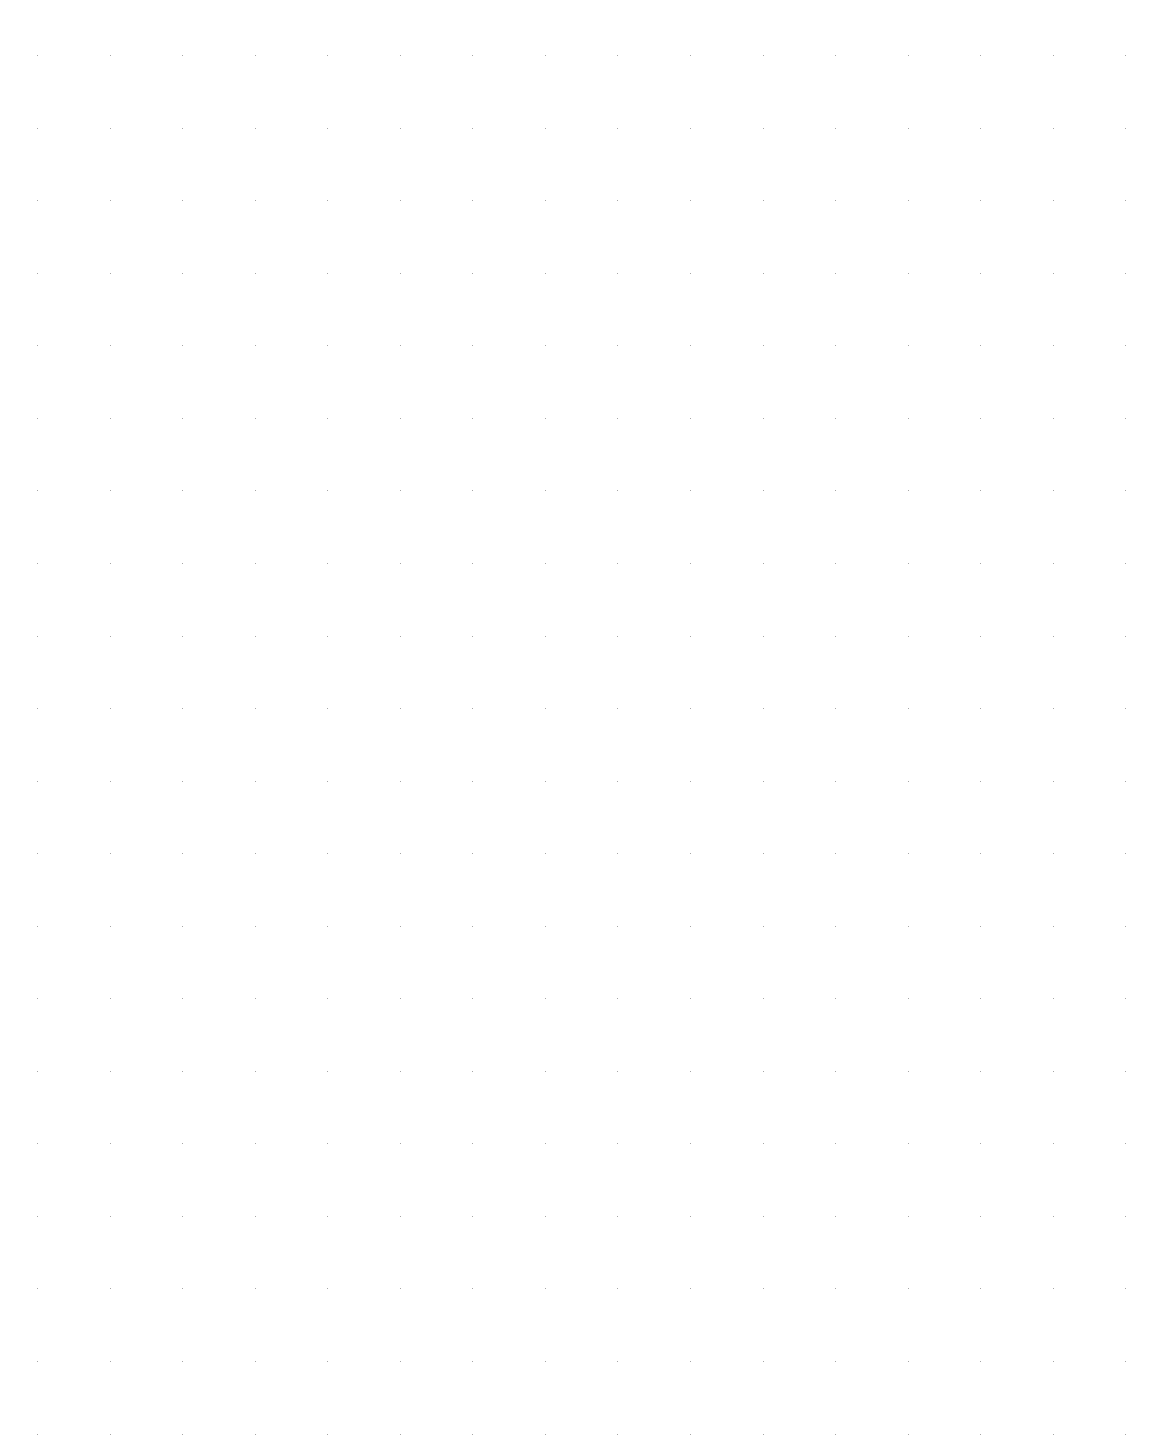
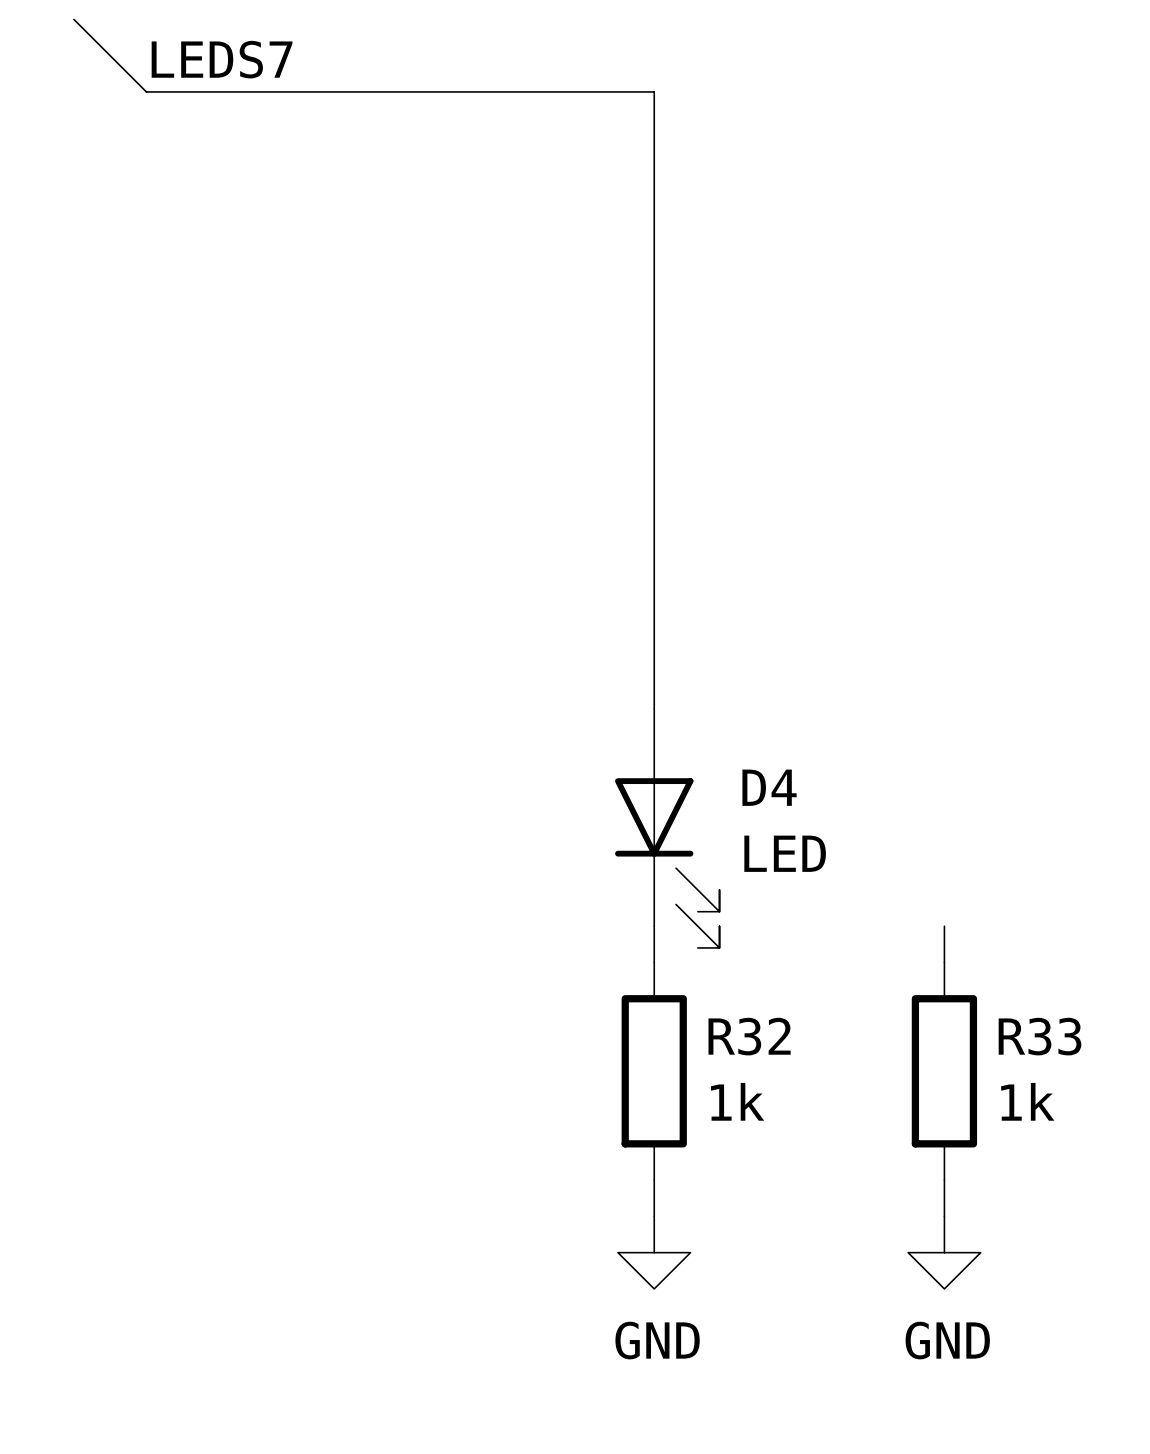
wire: none -> (73, 19) (146, 91) (654, 91) (654, 708)
label: none -> LEDS7 (222, 59)
D4: none -> LED (667, 828)
wire: none -> (654, 926) (654, 962)
wire: none -> (944, 926) (944, 962)
R32: none -> 1k (654, 1071)
R33: none -> 1k (944, 1071)
wire: none -> (654, 1180) (654, 1216)
wire: none -> (944, 1180) (944, 1216)
power symbol: none -> GND (654, 1252)
power symbol: none -> GND (944, 1252)

